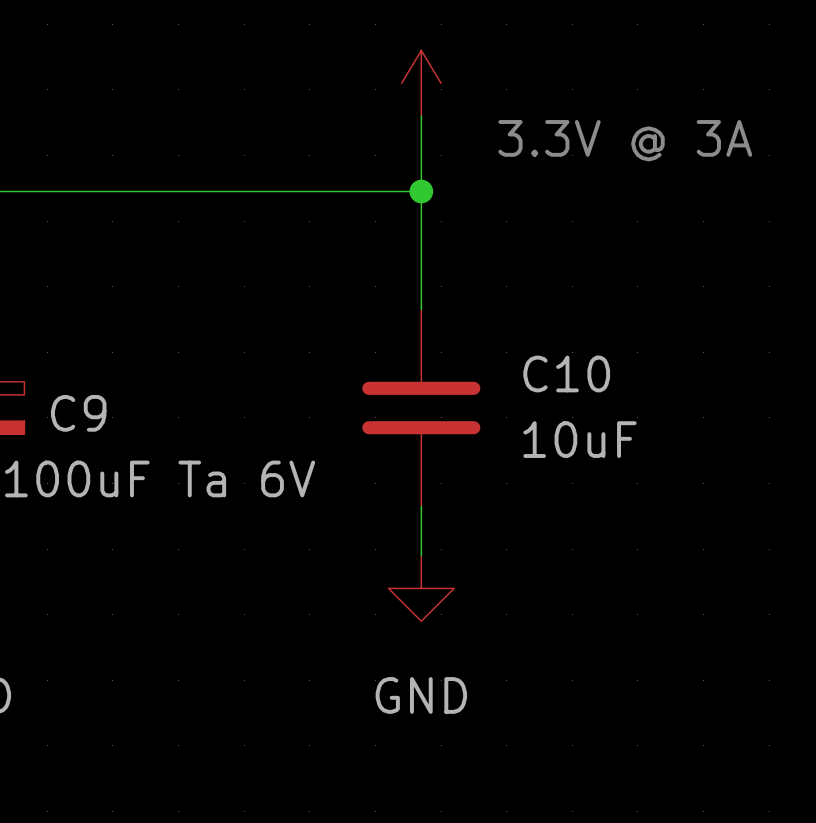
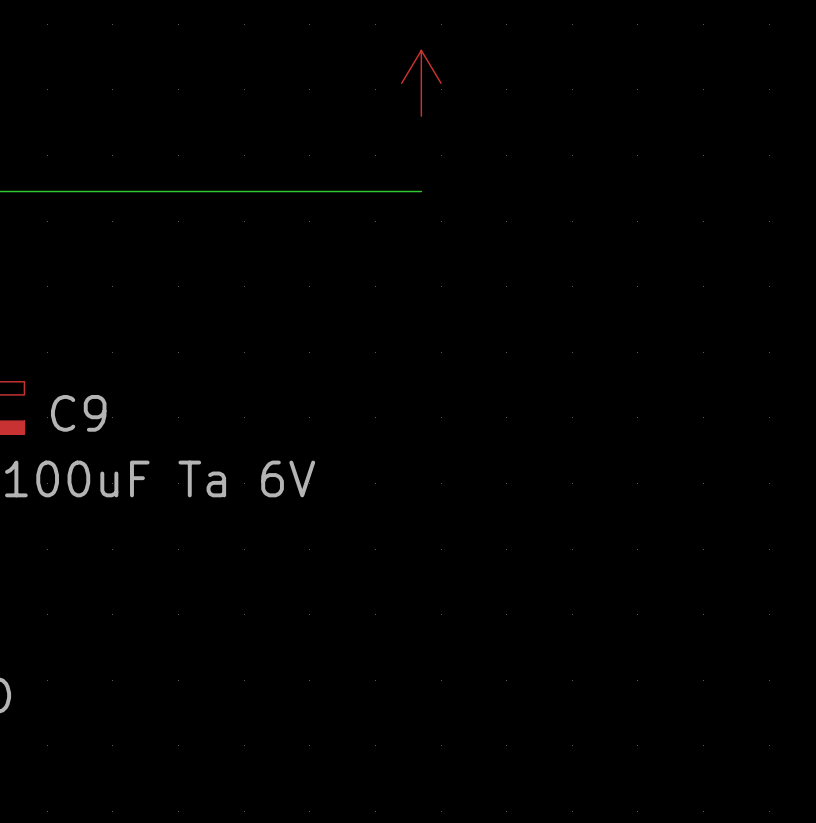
wire: (421, 116) (421, 309) -> none
text: 3.3V @ 3A (625, 140) -> none
junction: (421, 191) -> none
C10: 10uF (421, 408) -> none
wire: (421, 506) (421, 555) -> none
power symbol: GND (421, 588) -> none

